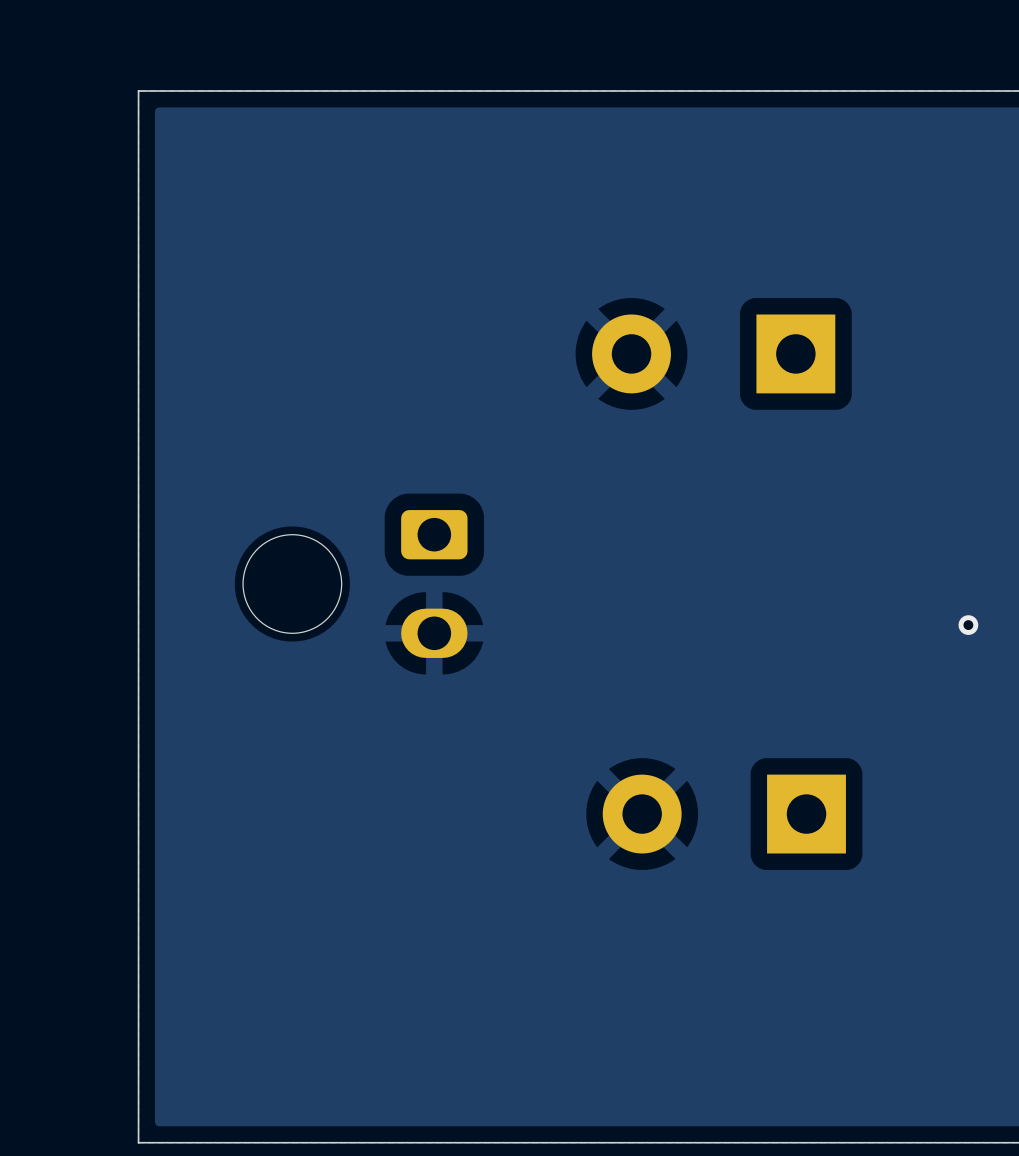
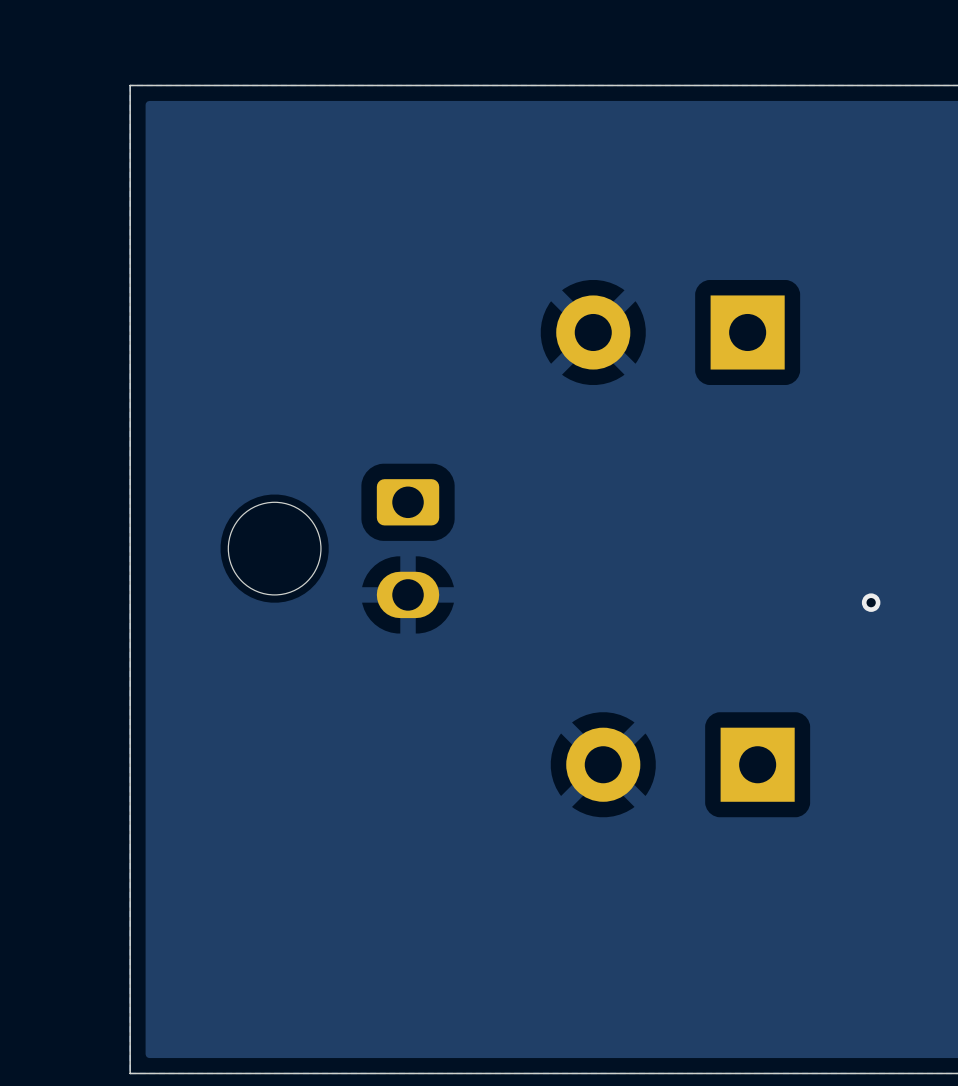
via position: (968, 625) -> (871, 602)

